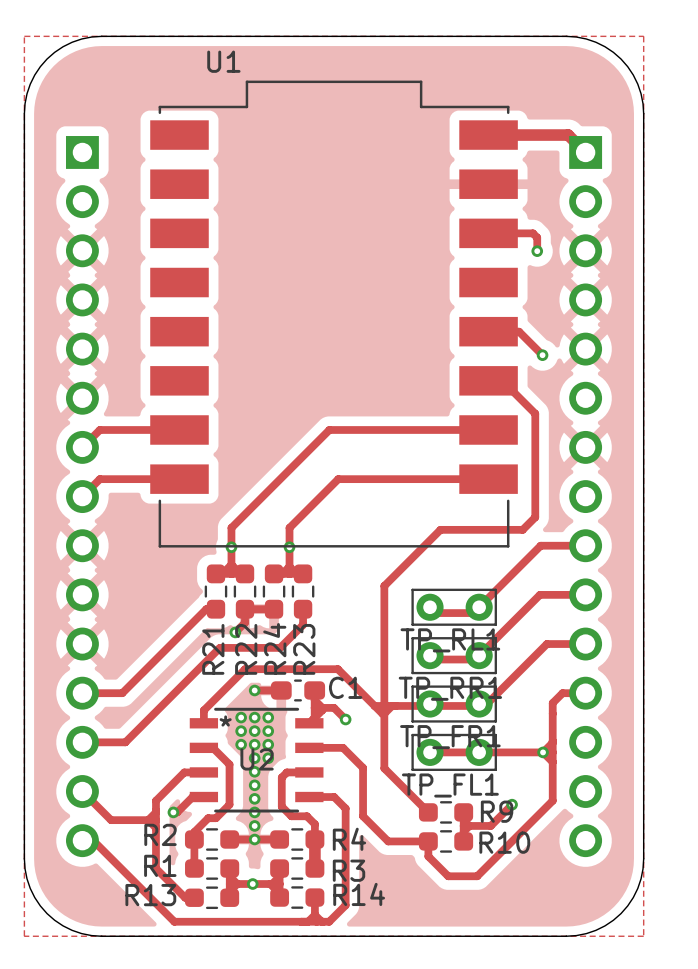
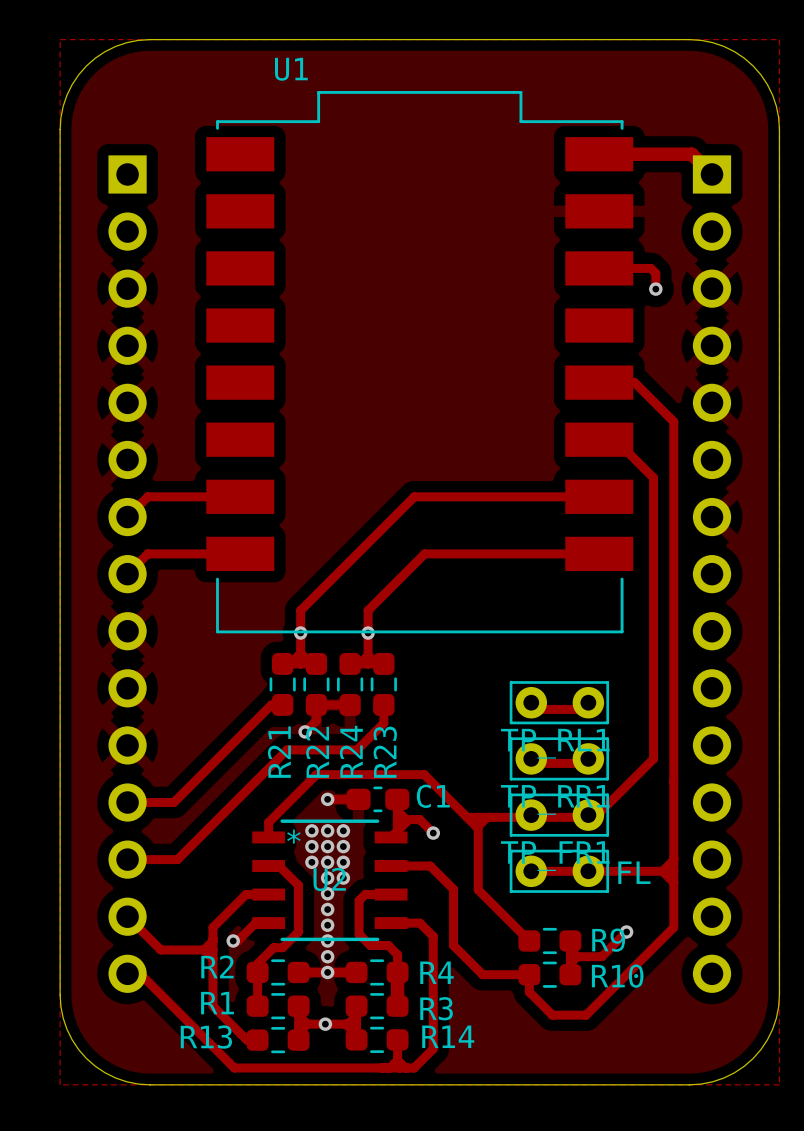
via: (542, 355) -> none
track: (535, 517) (522, 529) (440, 529) (384, 585) (384, 705) -> none
track: (585, 545) (540, 545) (479, 607) -> none
track: (585, 594) (539, 594) (479, 655) -> none
track: (585, 644) (546, 644) (535, 655) -> (653, 598) (653, 758)
track: (585, 693) (562, 693) (552, 703) -> (662, 409) (673, 421) (673, 813)
via: (543, 752) -> none
TP_FL1 name: TP_FL1 (450, 785) -> FL (634, 872)

